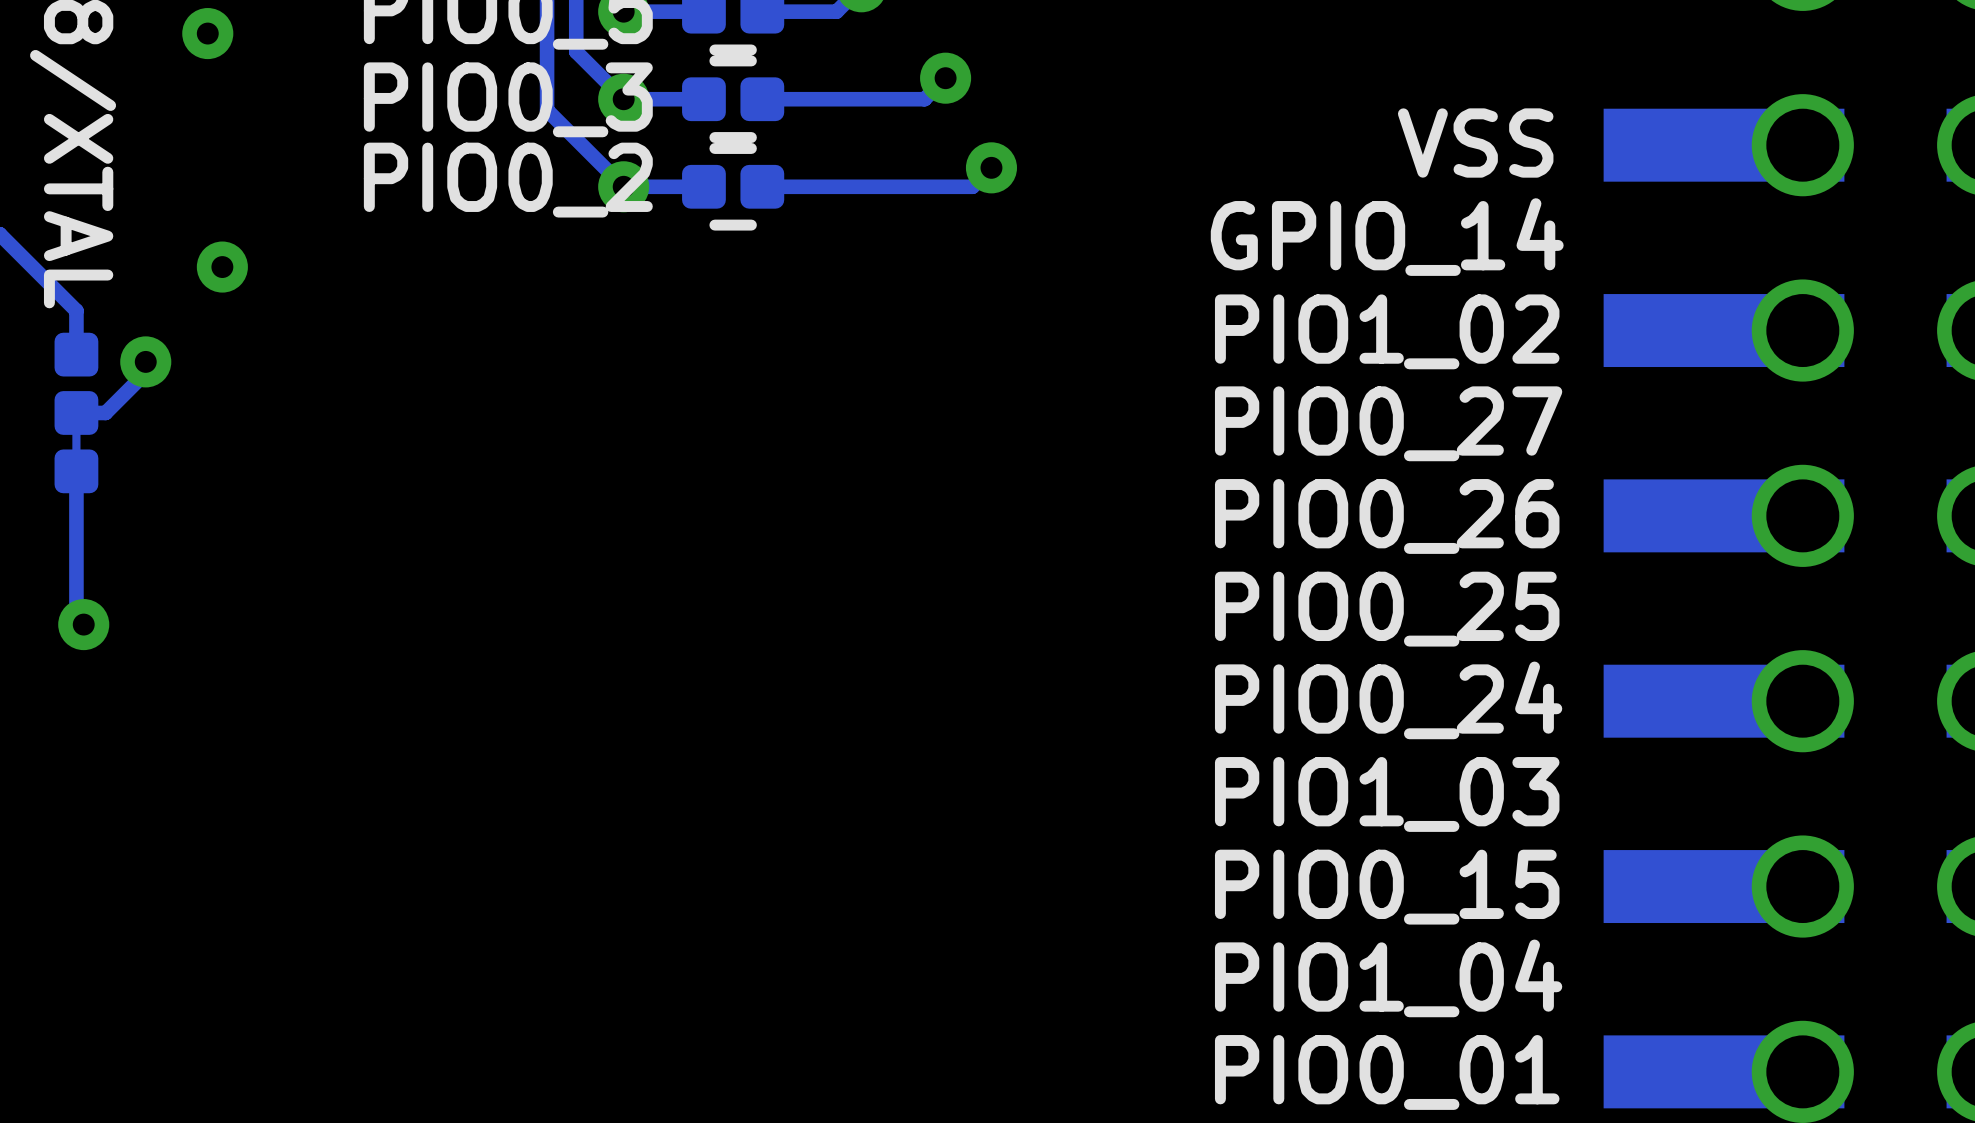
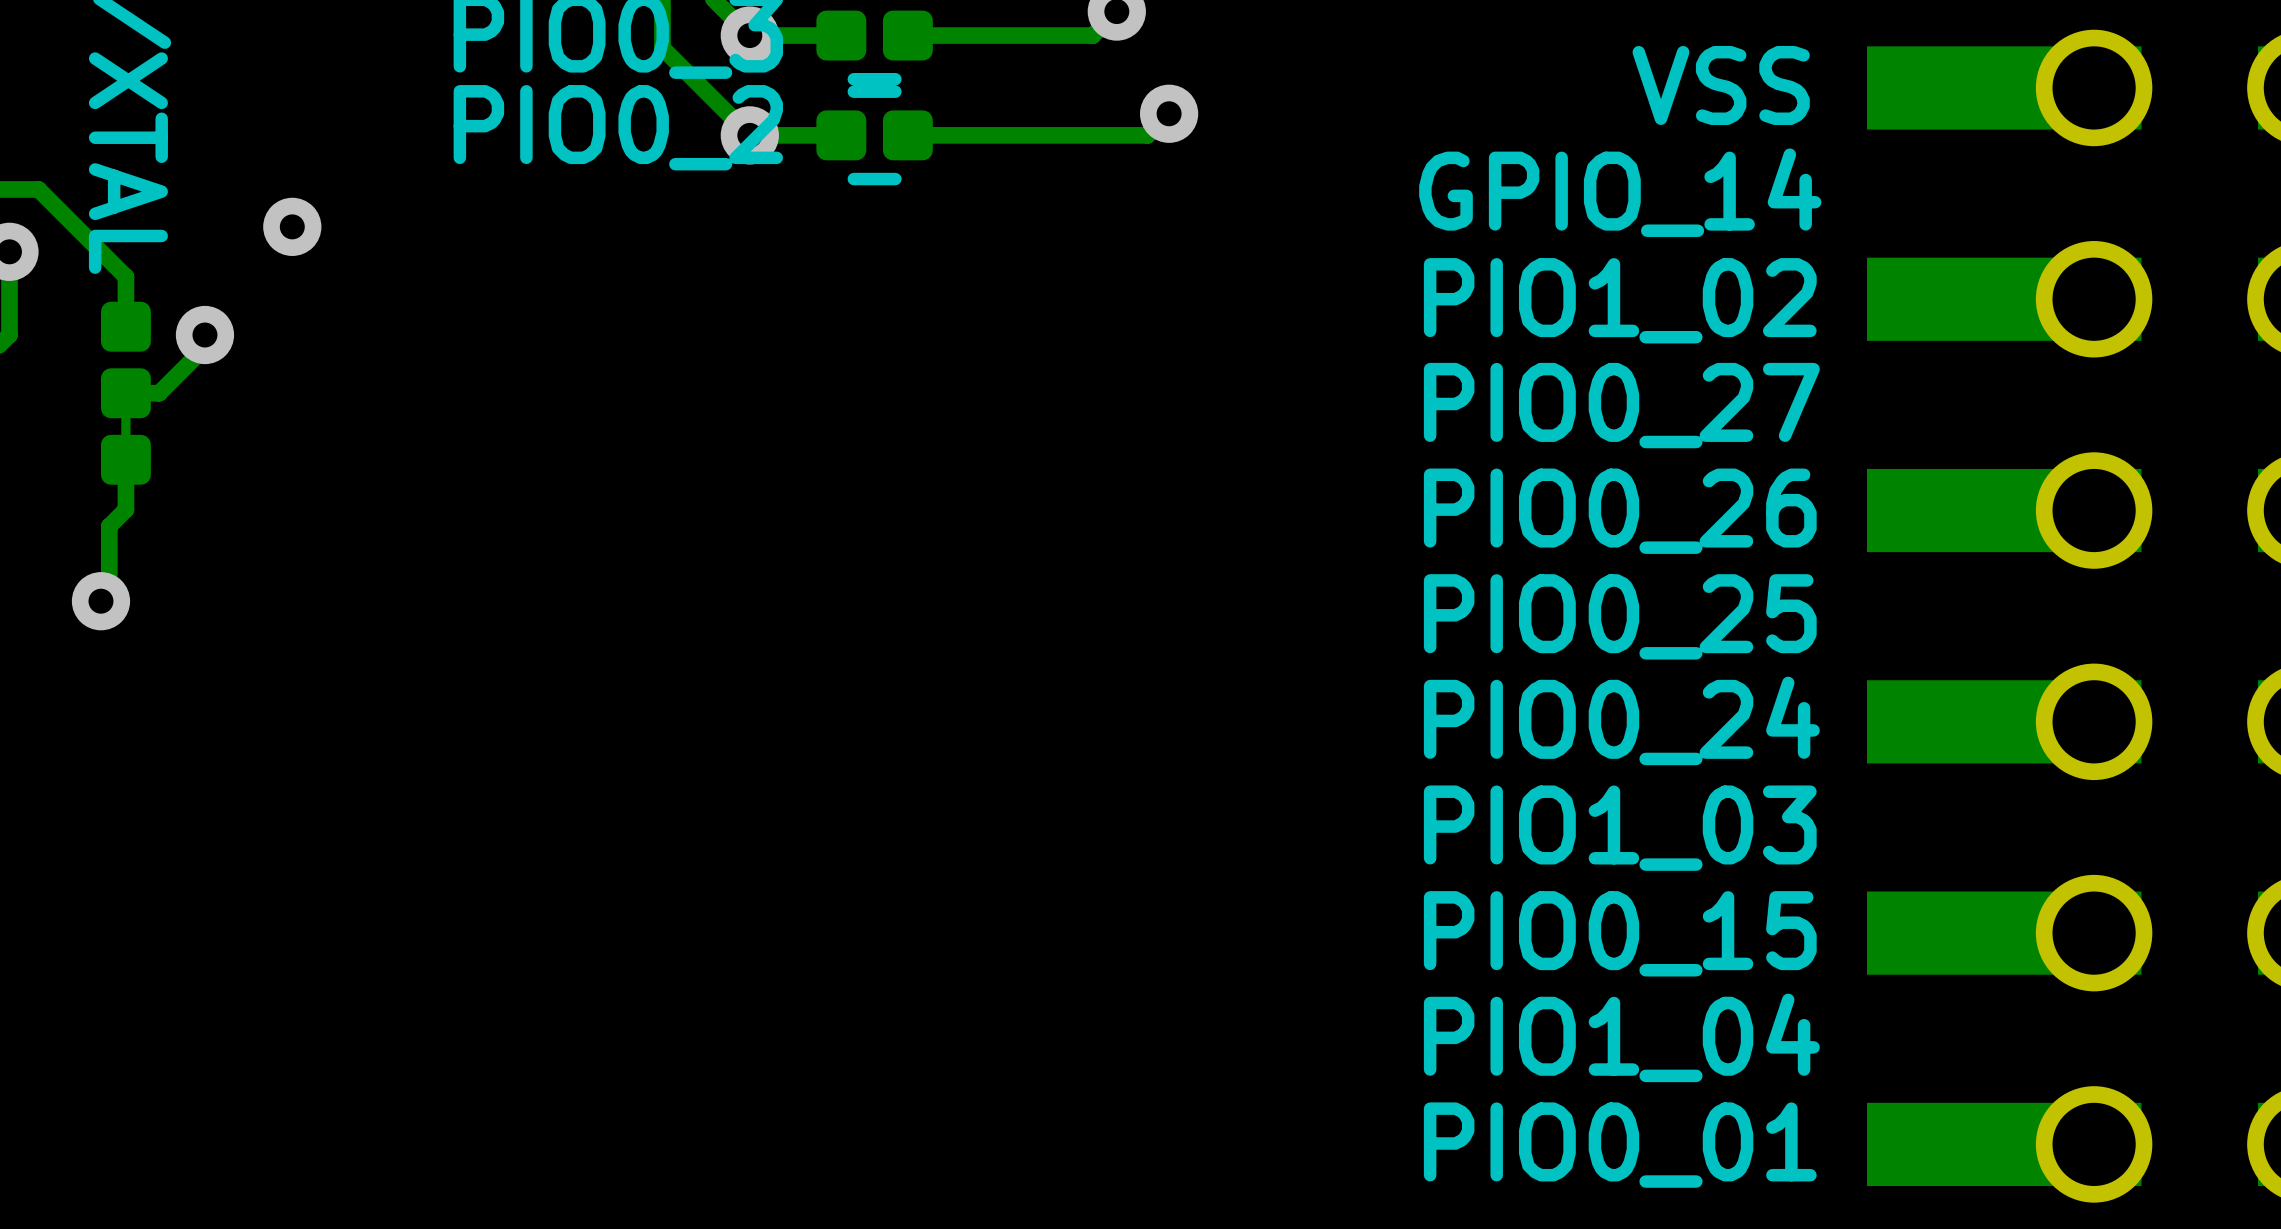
track: (76, 515) (76, 617) (83, 624) -> (125, 509) (109, 526) (109, 592) (100, 601)
via position: (83, 624) -> (100, 601)

